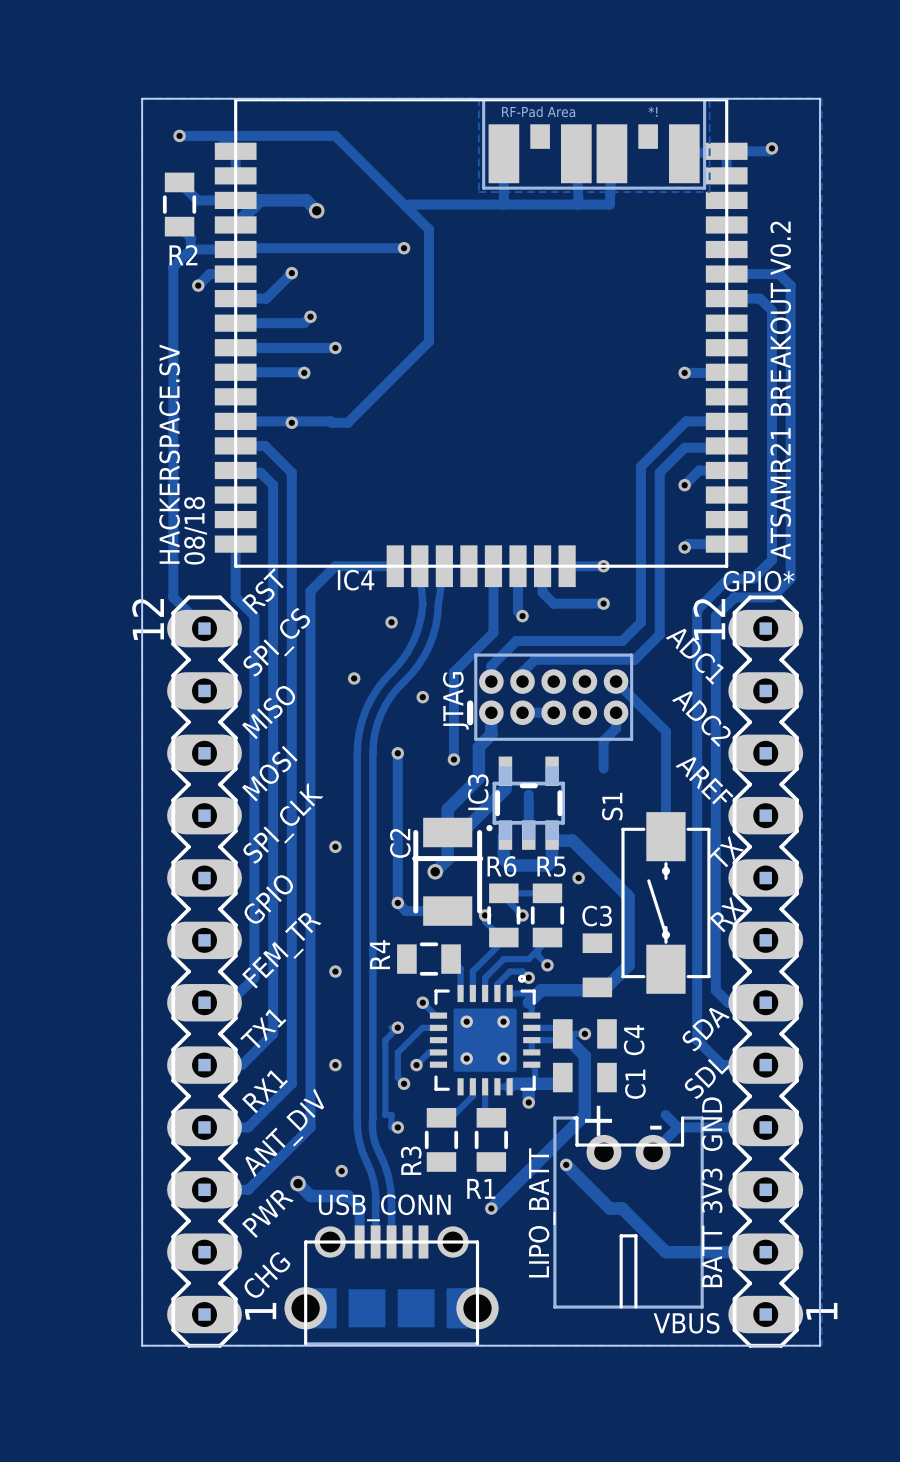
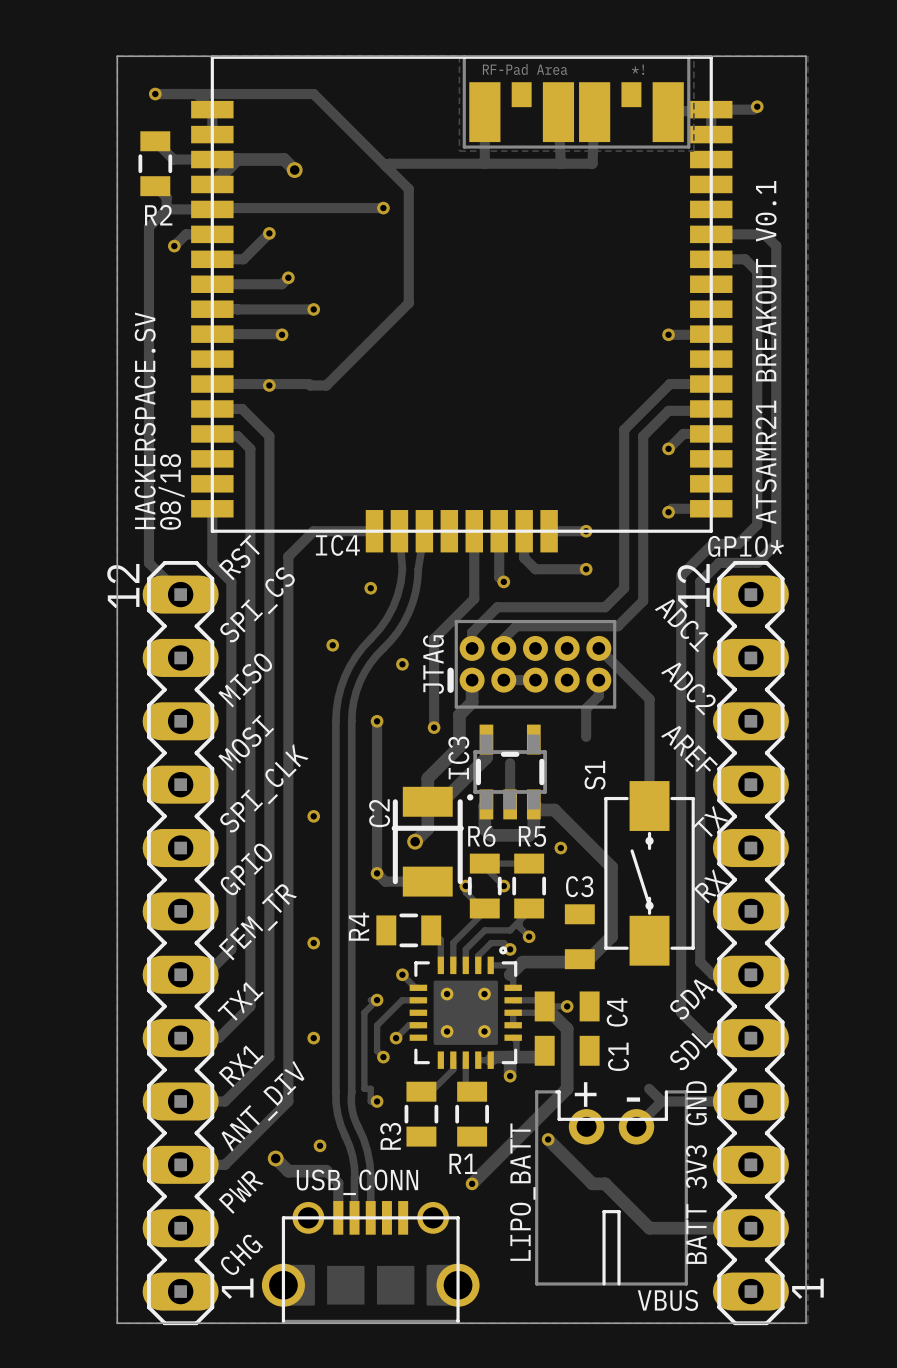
text: ATSAMR21 BREAKOUT V0.2 (780, 390) -> ATSAMR21 BREAKOUT V0.1 (766, 352)

